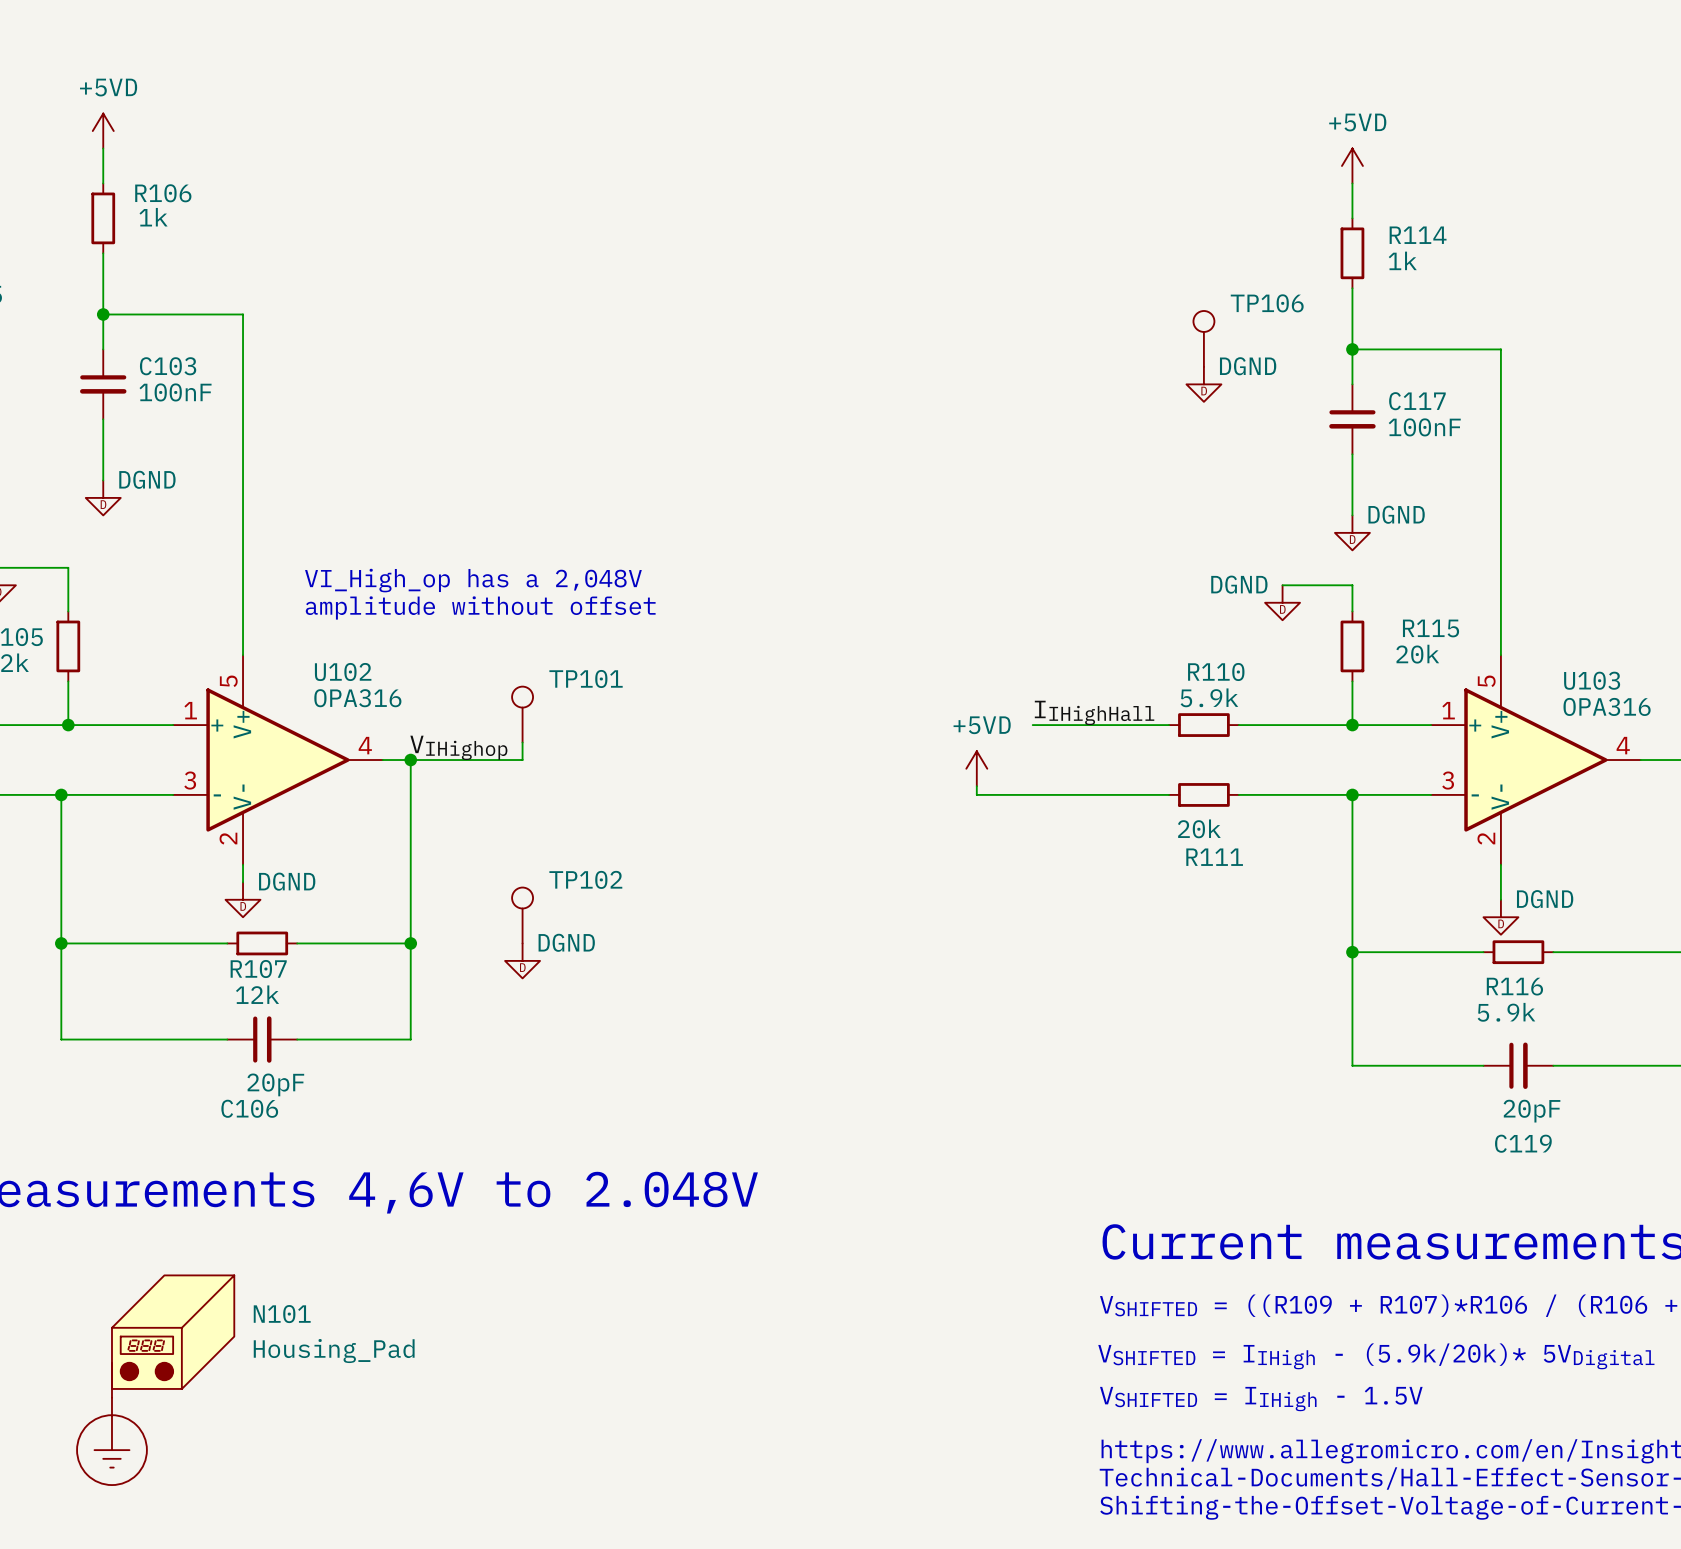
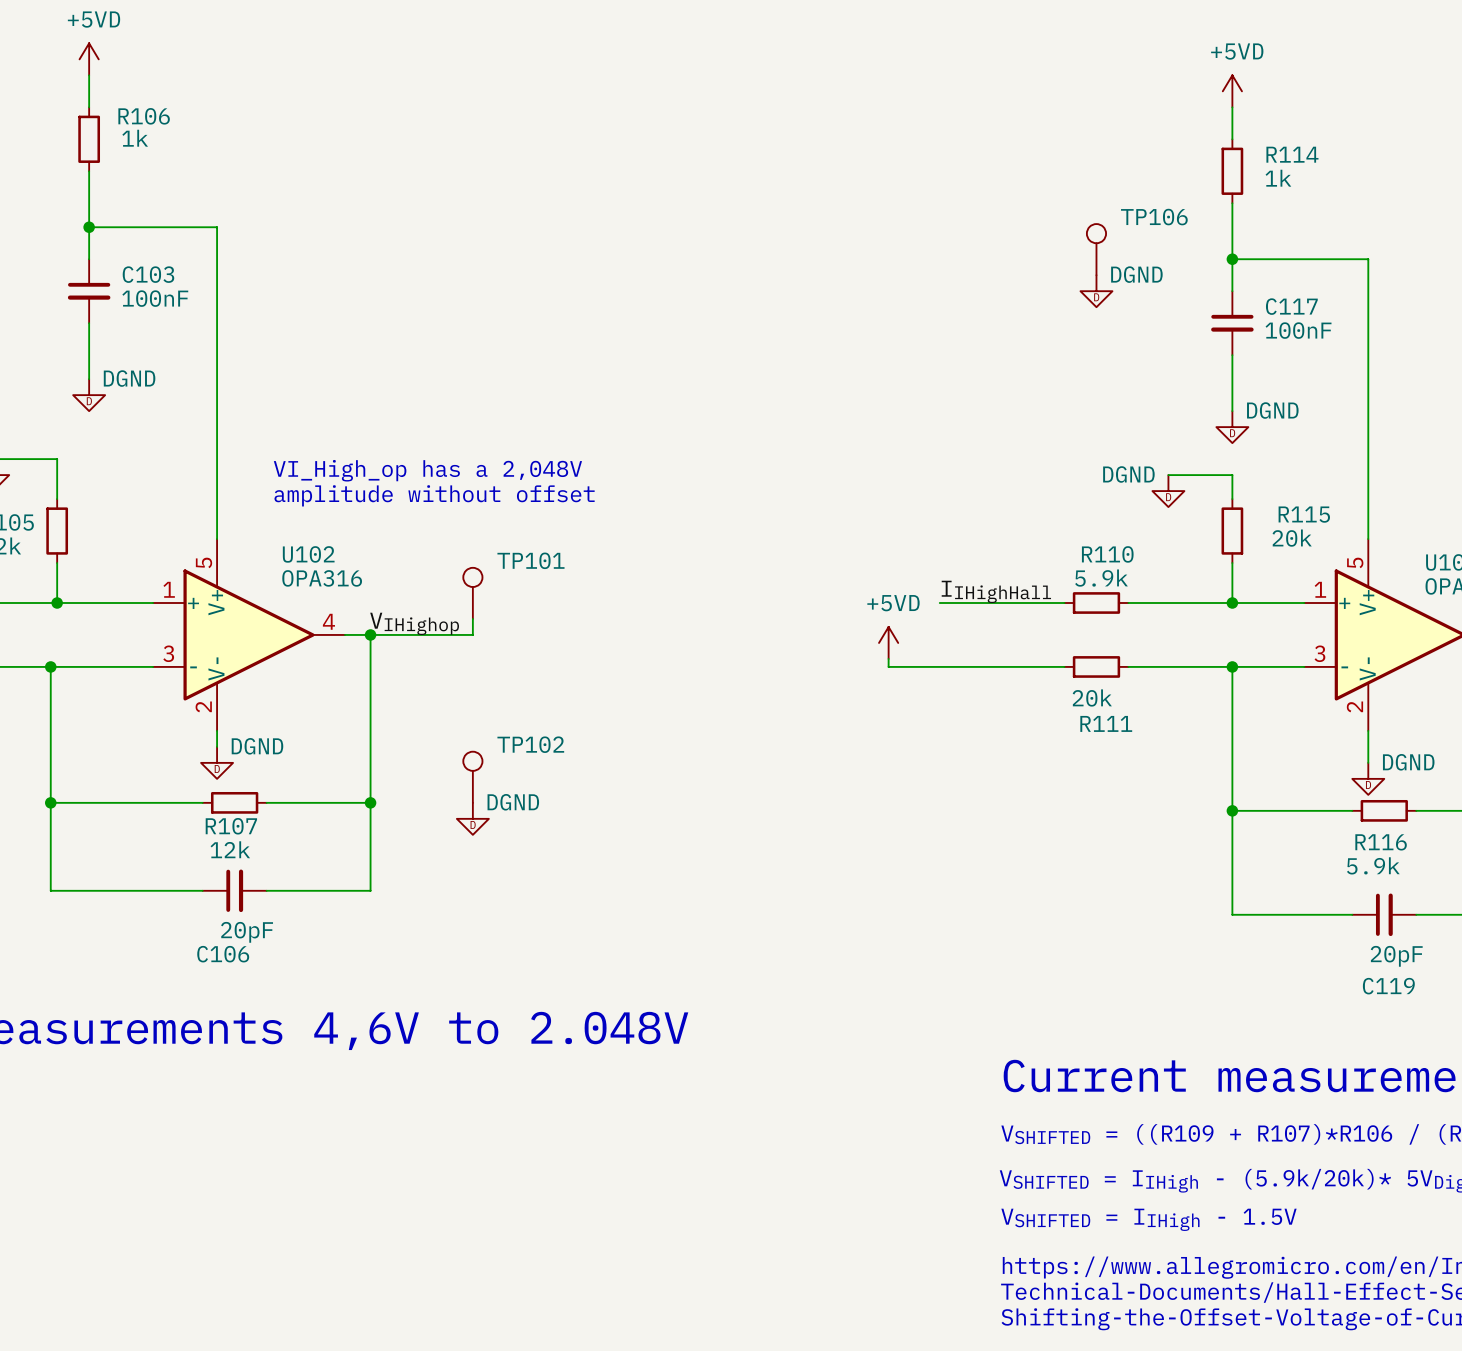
N101: Housing_Pad (173, 1336) -> none
power symbol: (111, 1441) -> none

